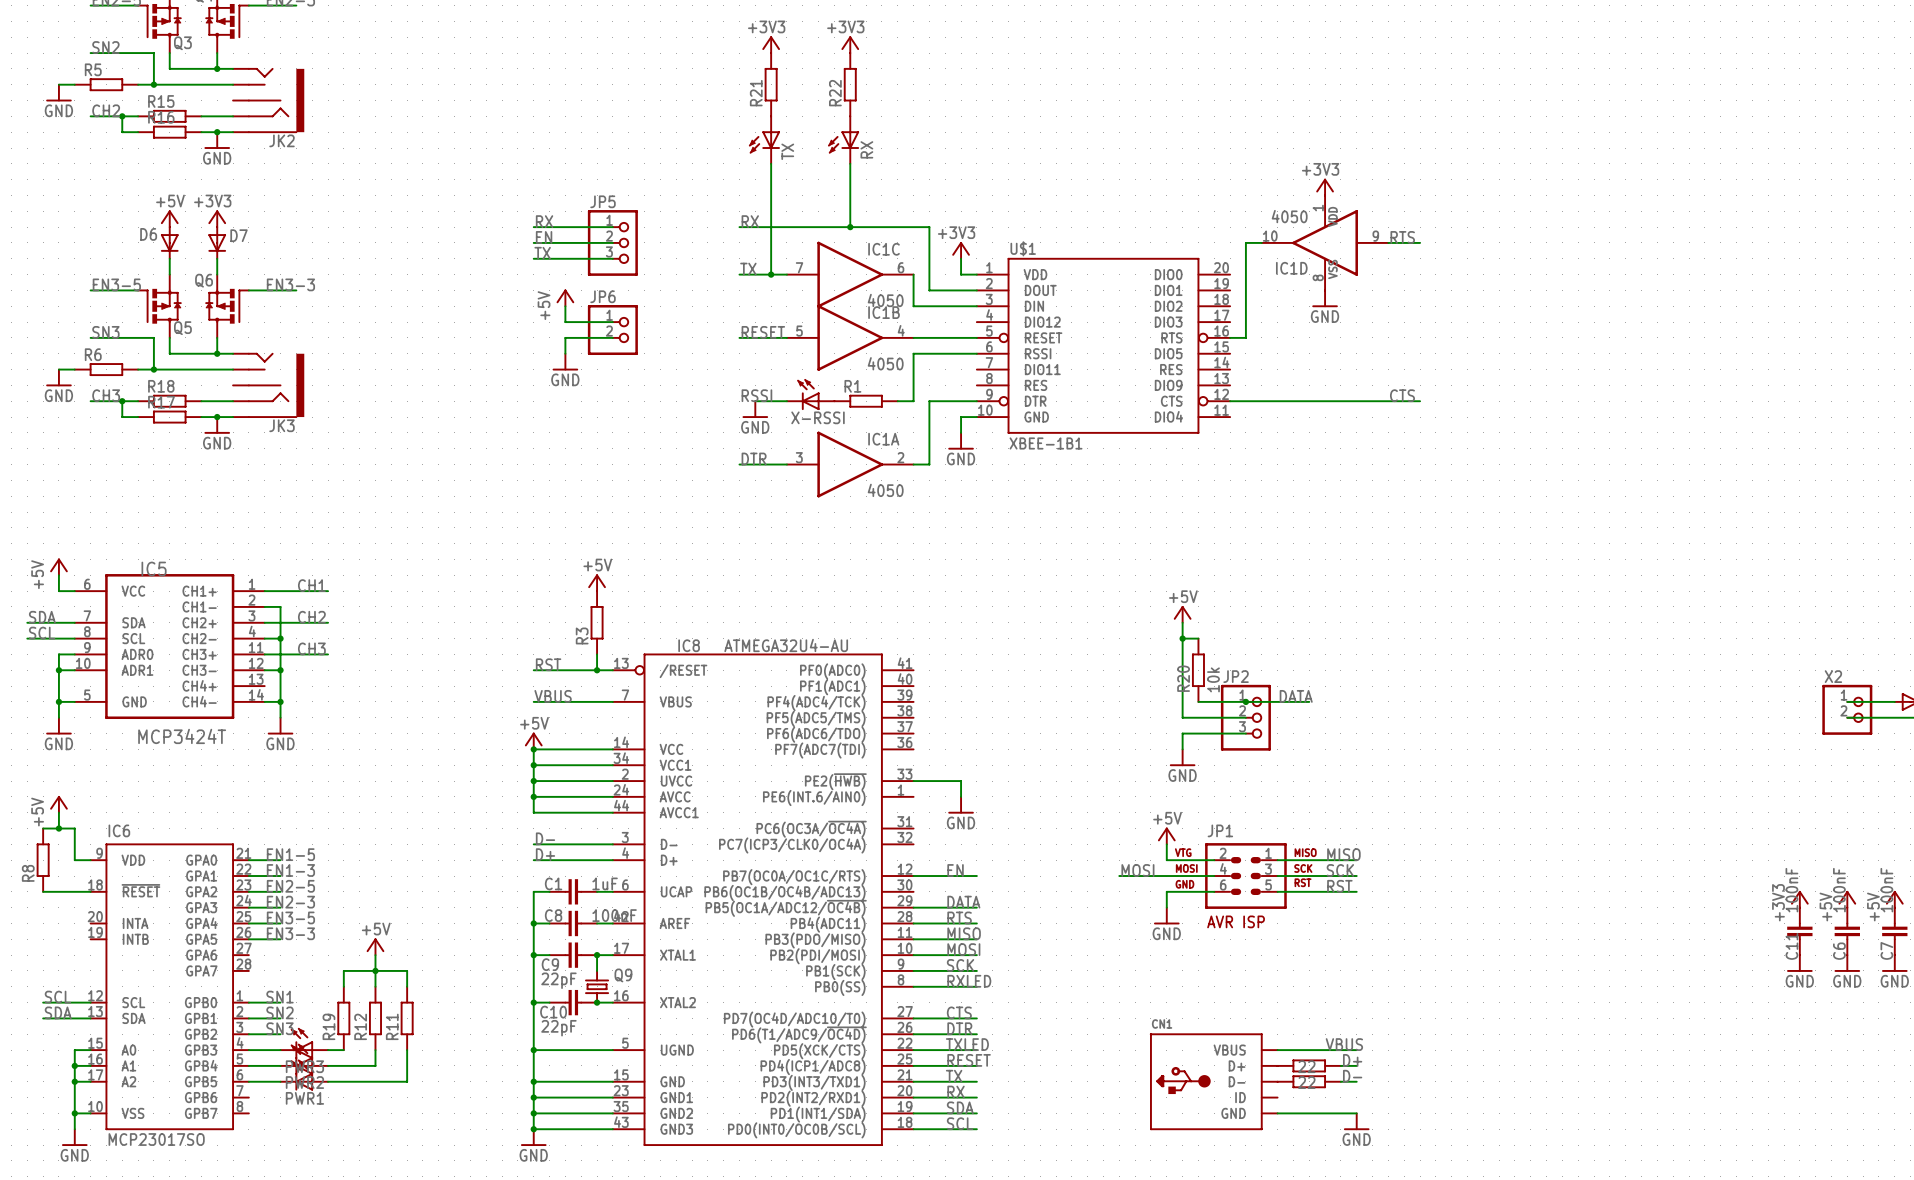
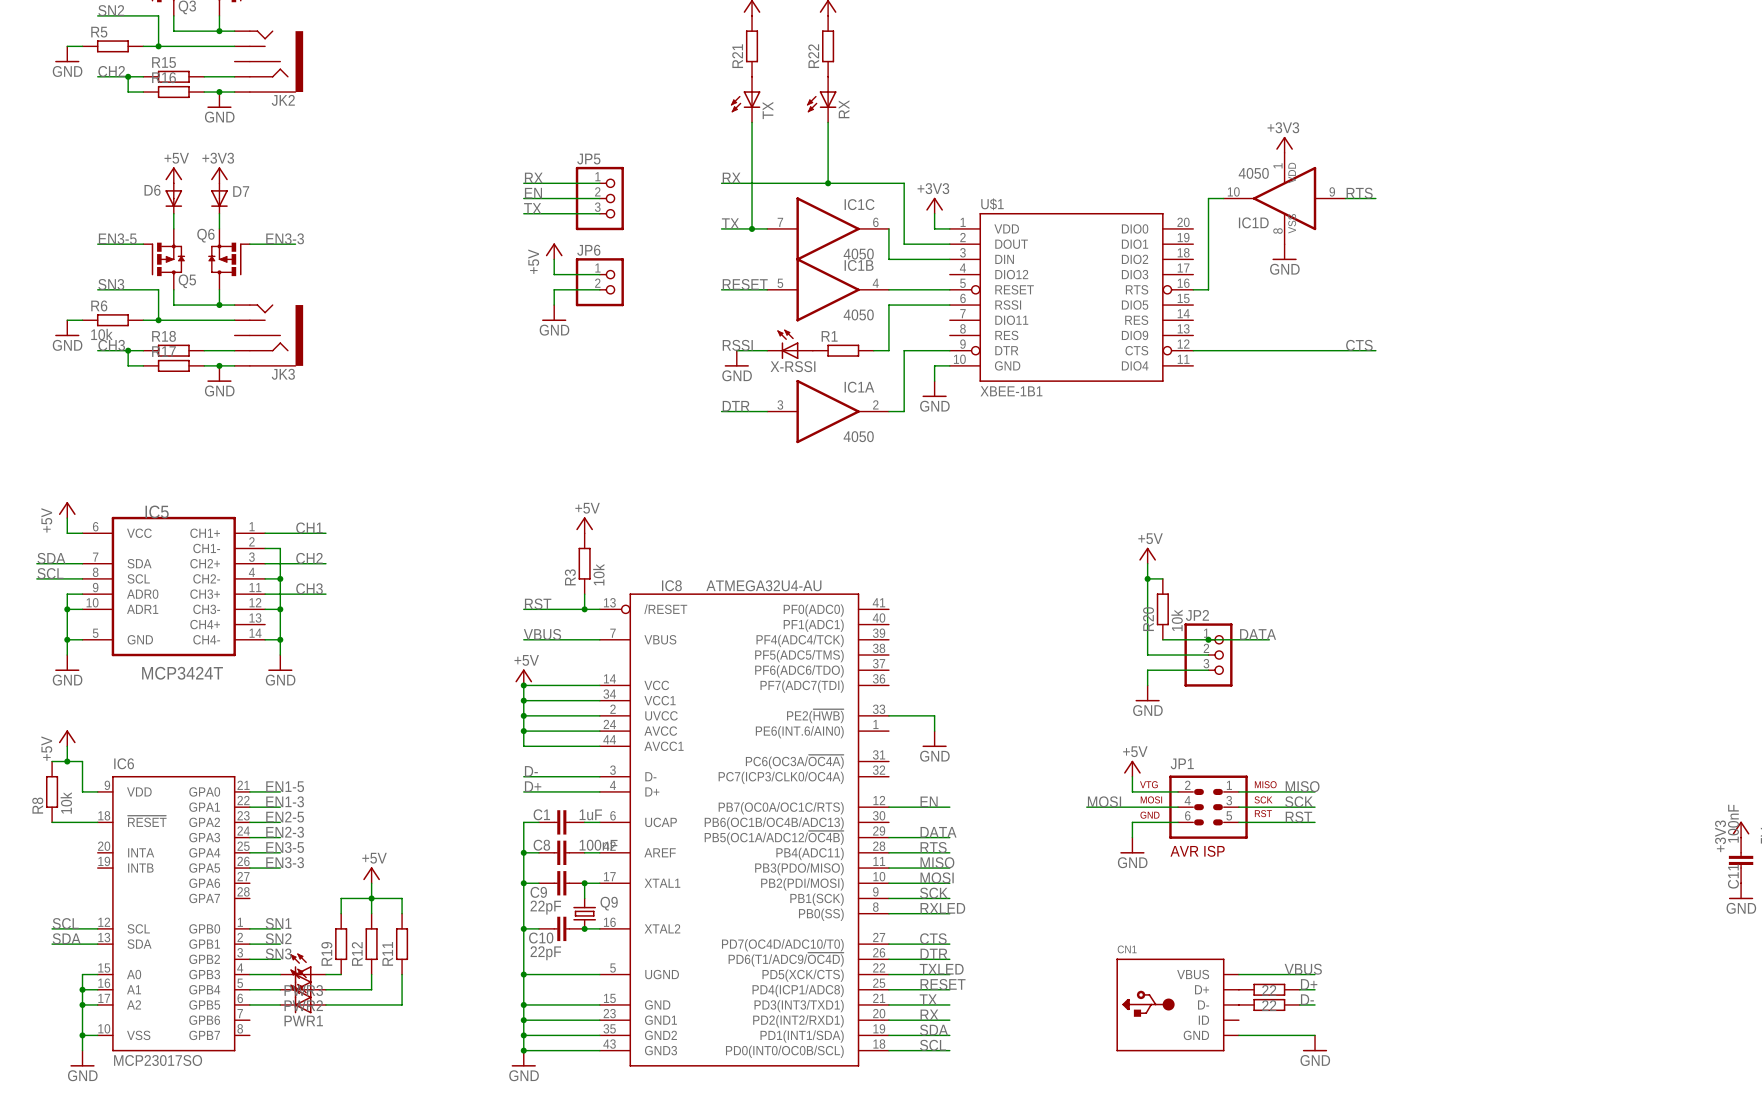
R6 value: none -> 10k (101, 334)
R3 value: none -> 10k (598, 574)
R8 value: none -> 10k (66, 803)

